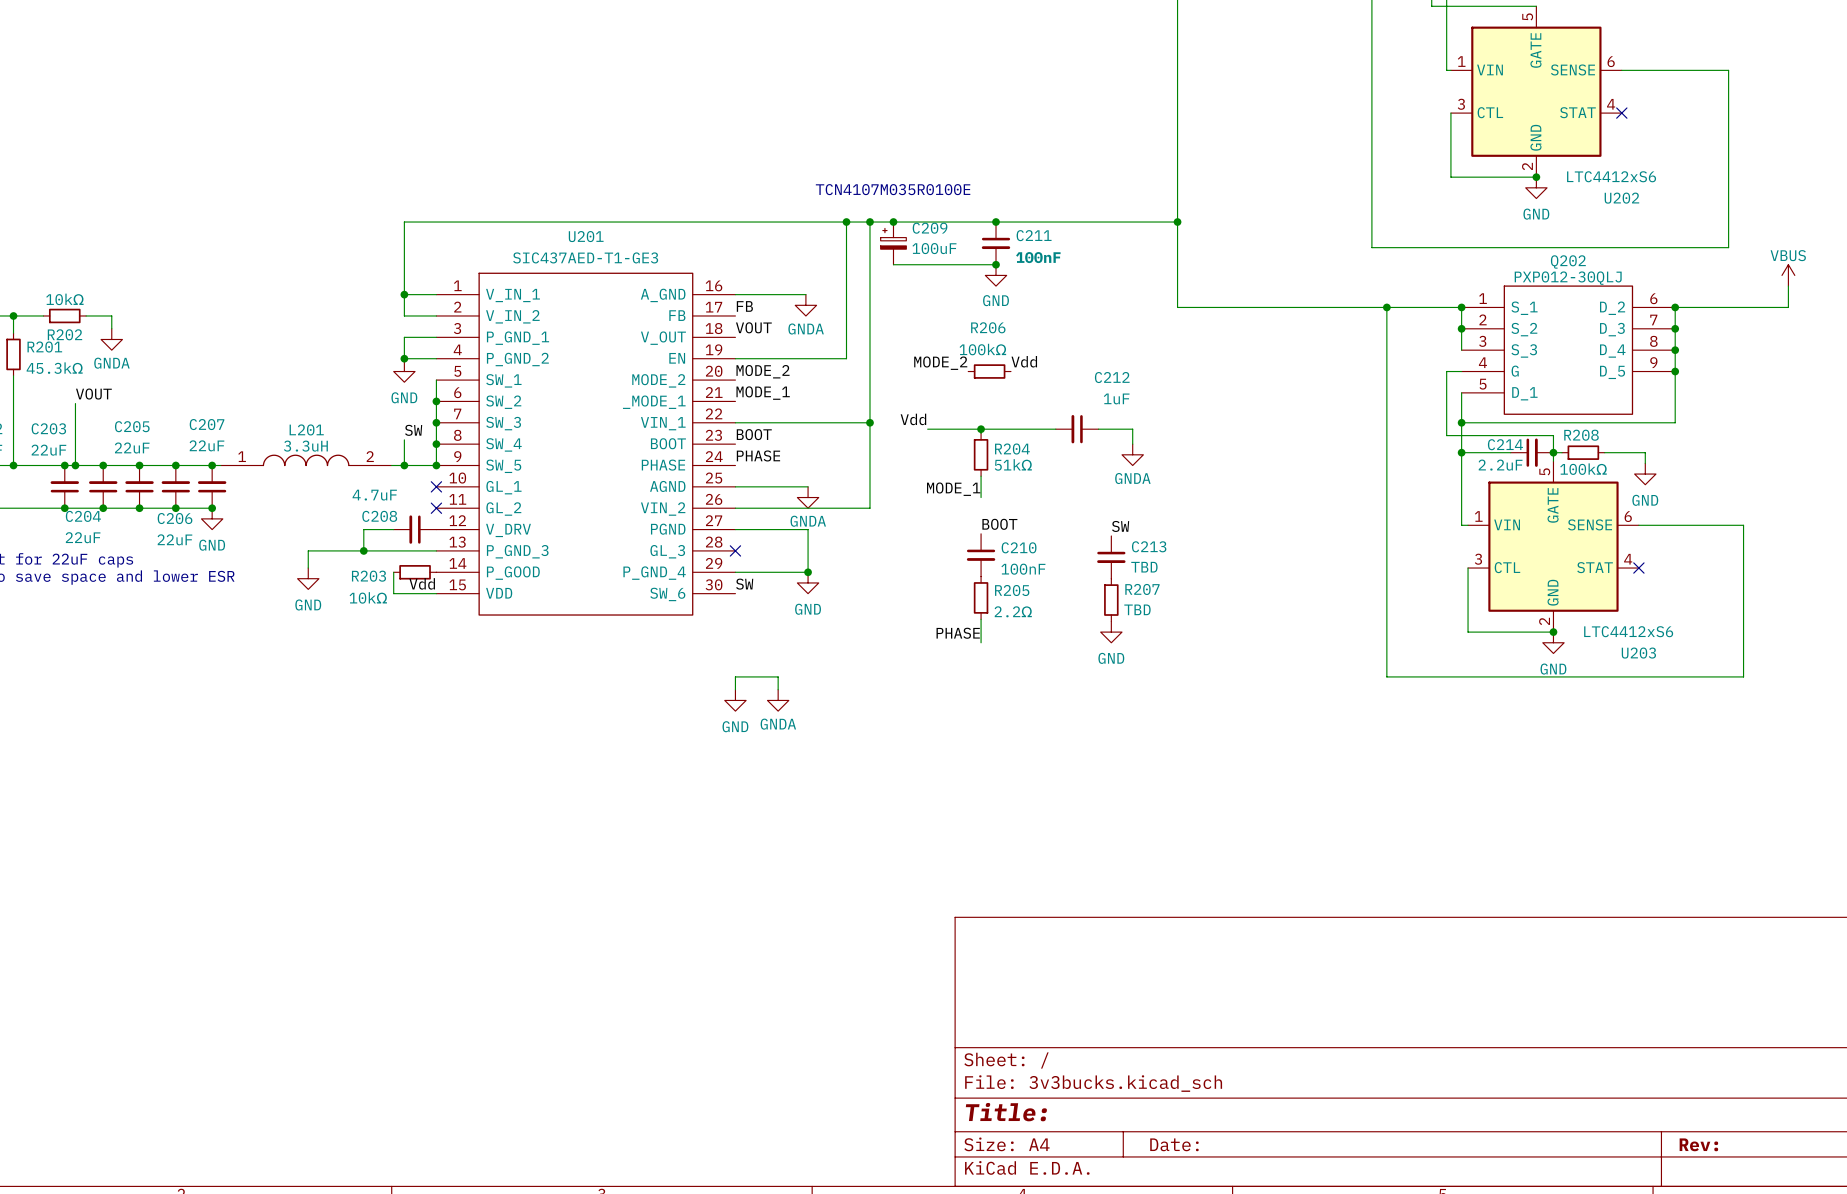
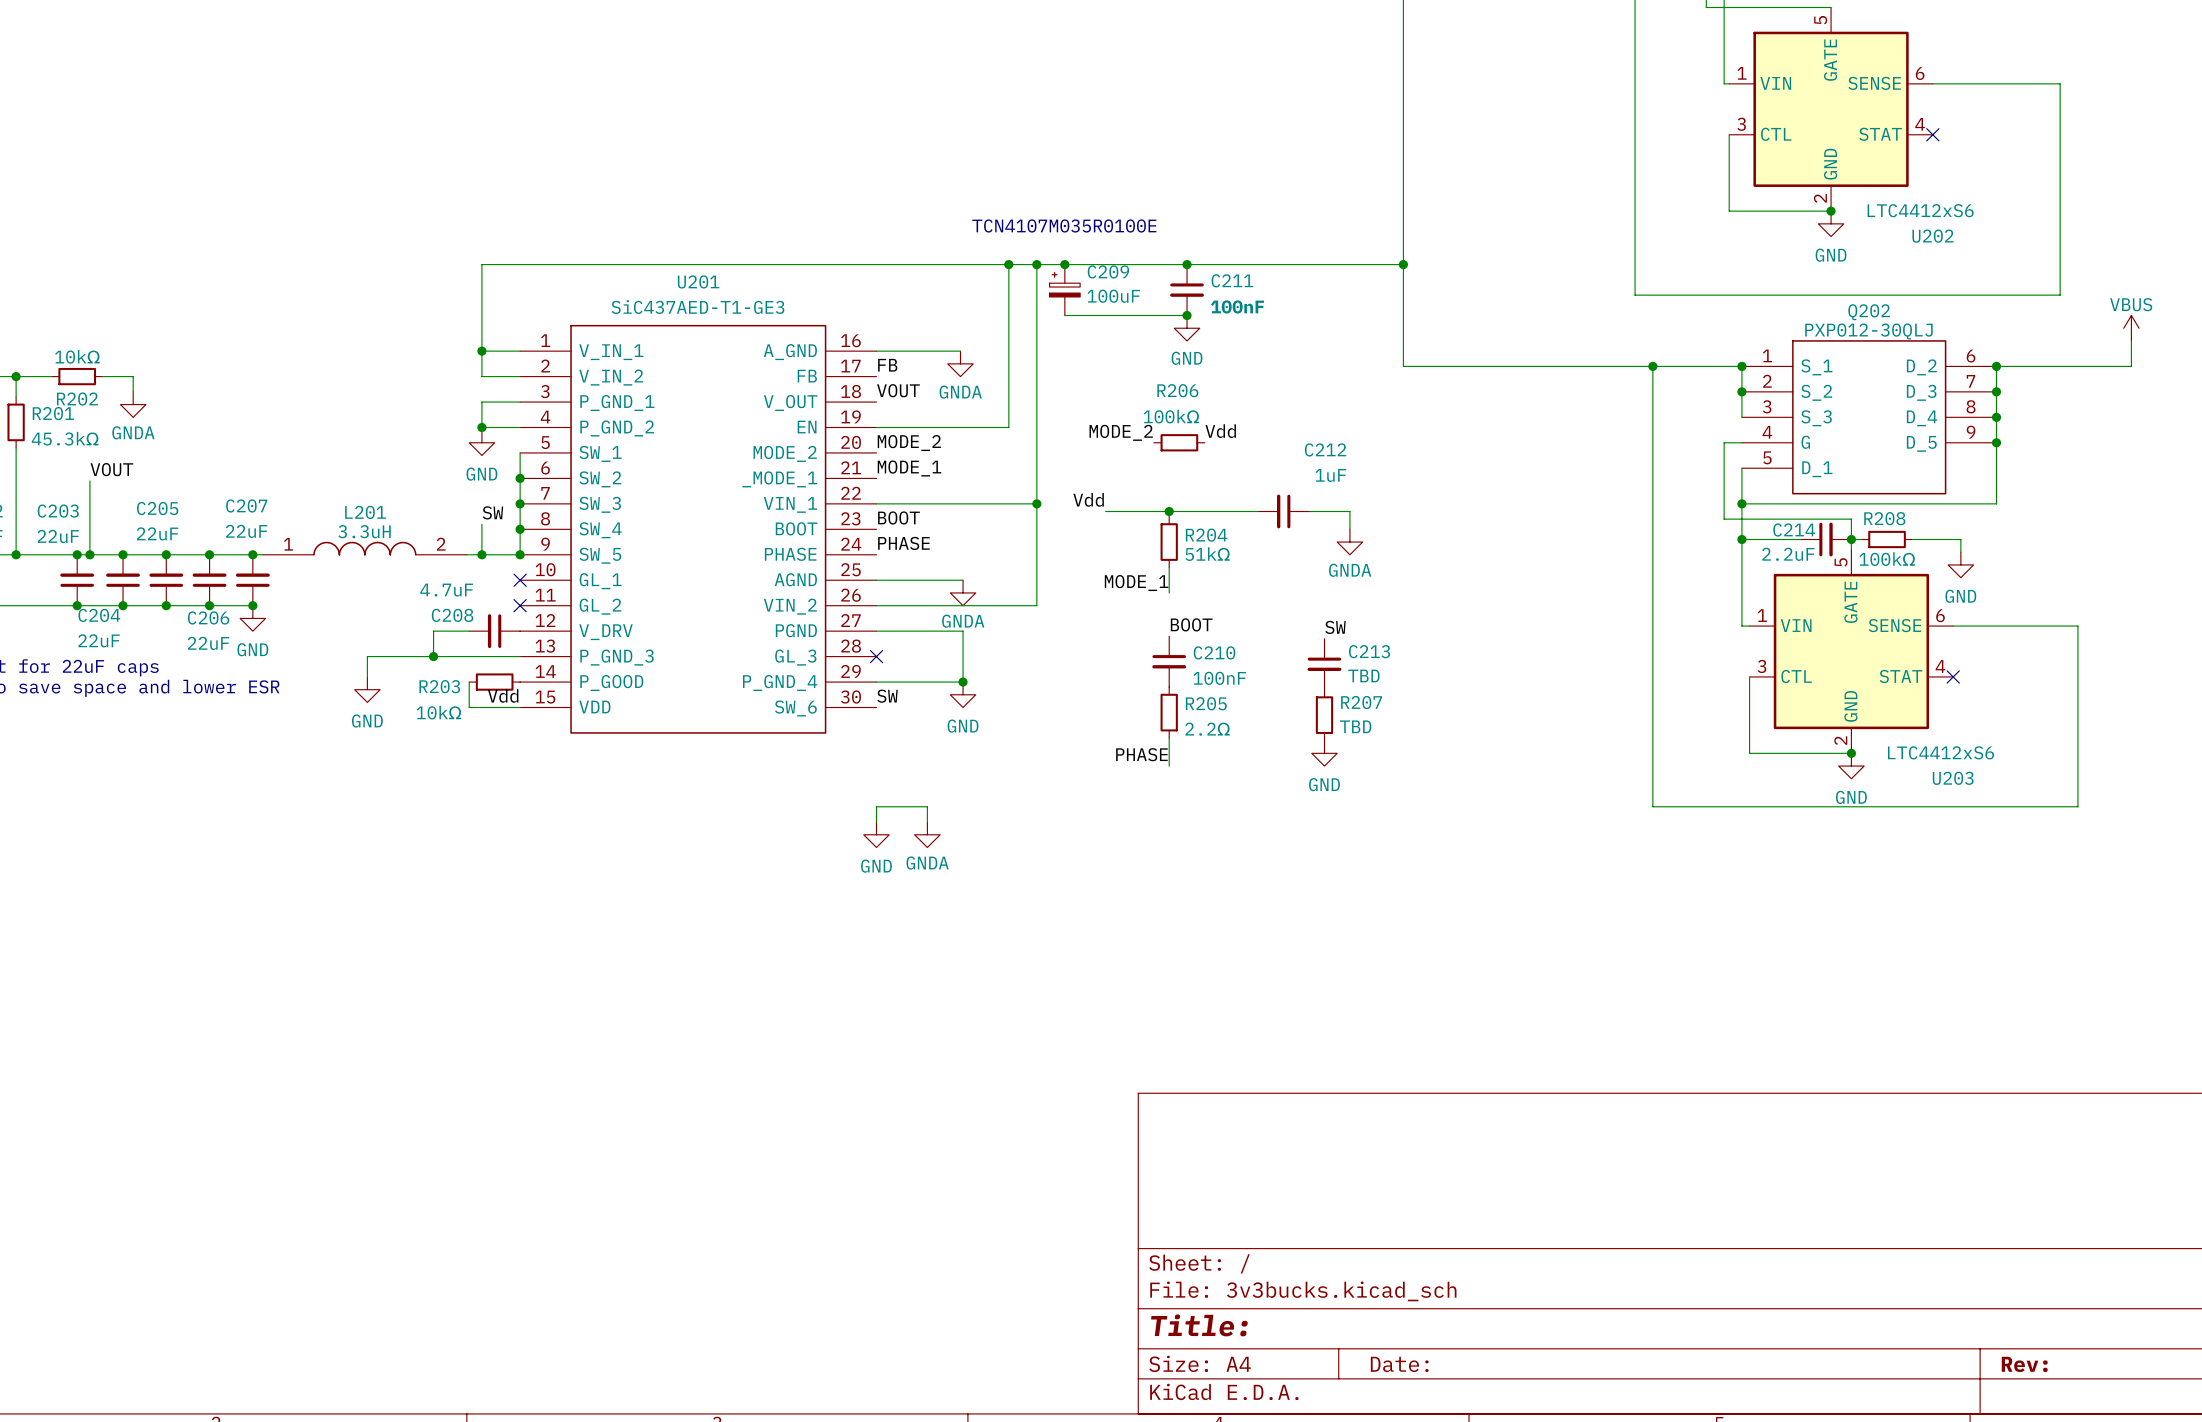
U201 value: SIC437AED-T1-GE3 (585, 257) -> SiC437AED-T1-GE3 (697, 307)

